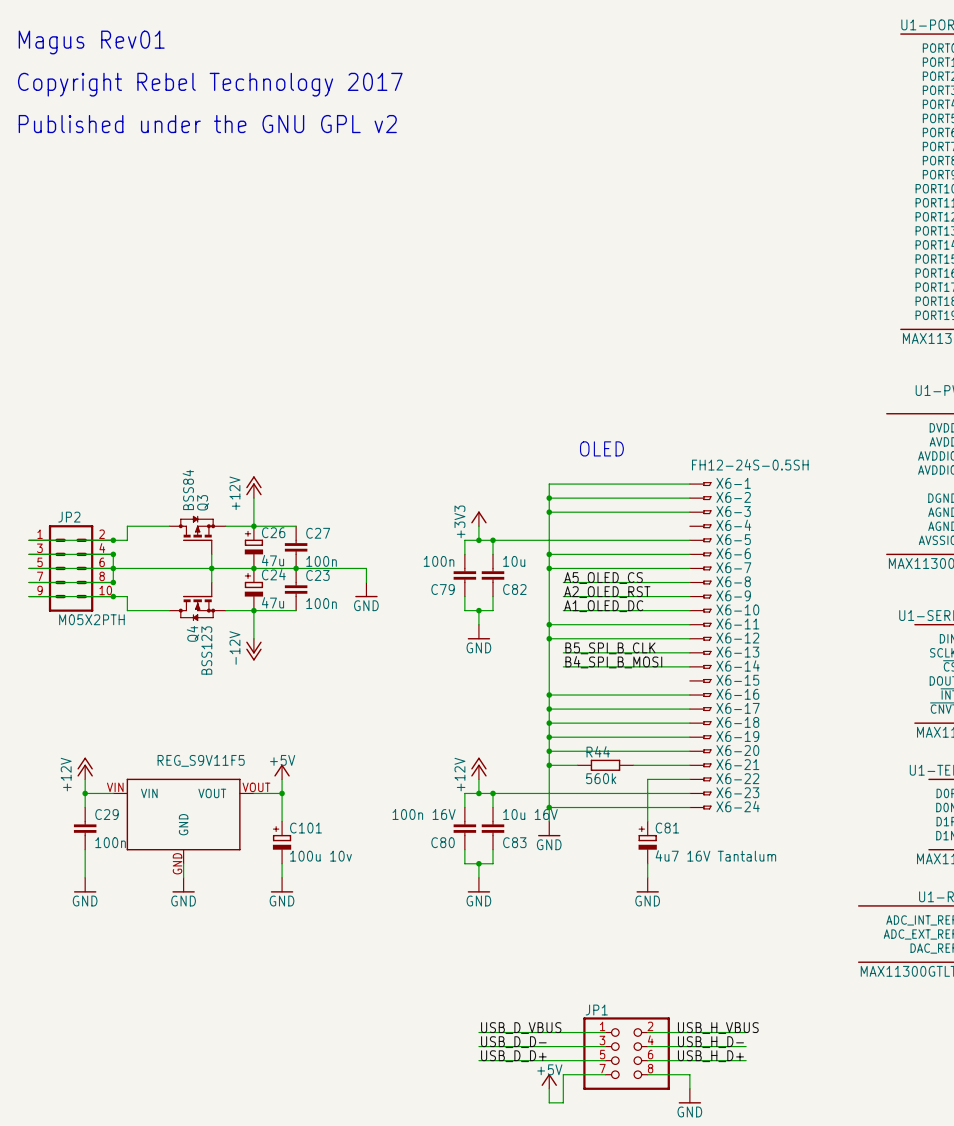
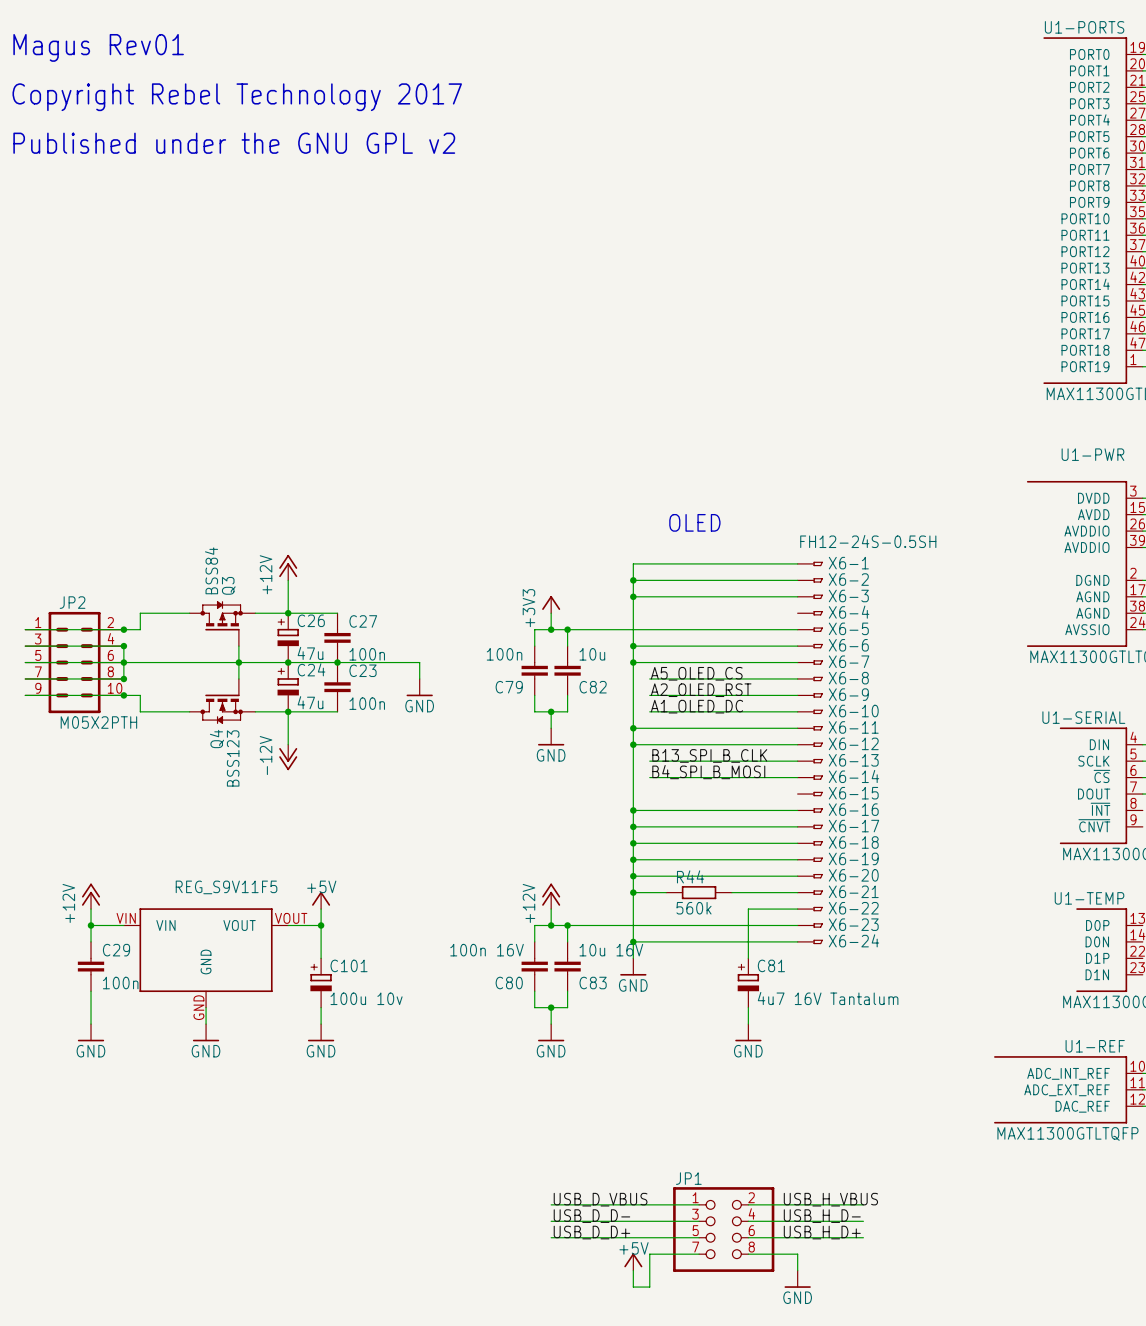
label: B5_SPI_B_CLK (610, 648) -> B13_SPI_B_CLK (709, 755)

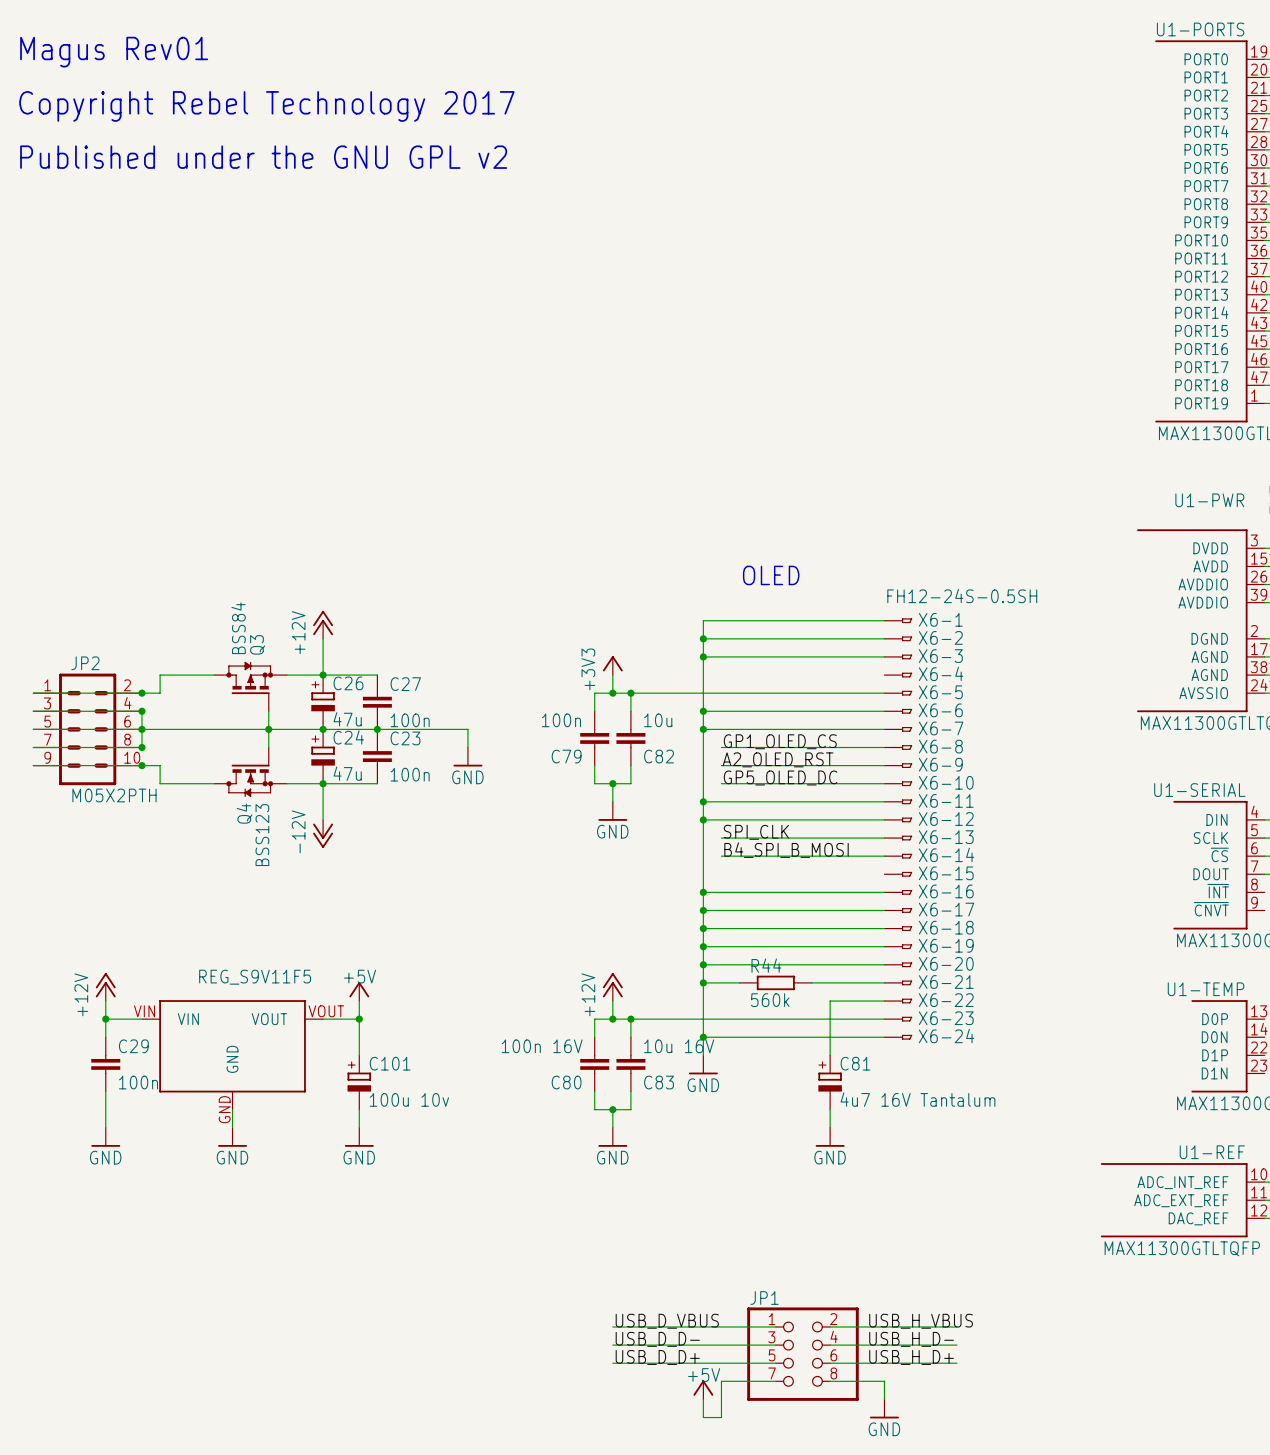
label: A5_OLED_CS (696, 673) -> GP1_OLED_CS (780, 741)
label: A1_OLED_DC (696, 706) -> GP5_OLED_DC (780, 777)
label: B13_SPI_B_CLK (709, 755) -> SPI_CLK (756, 832)

